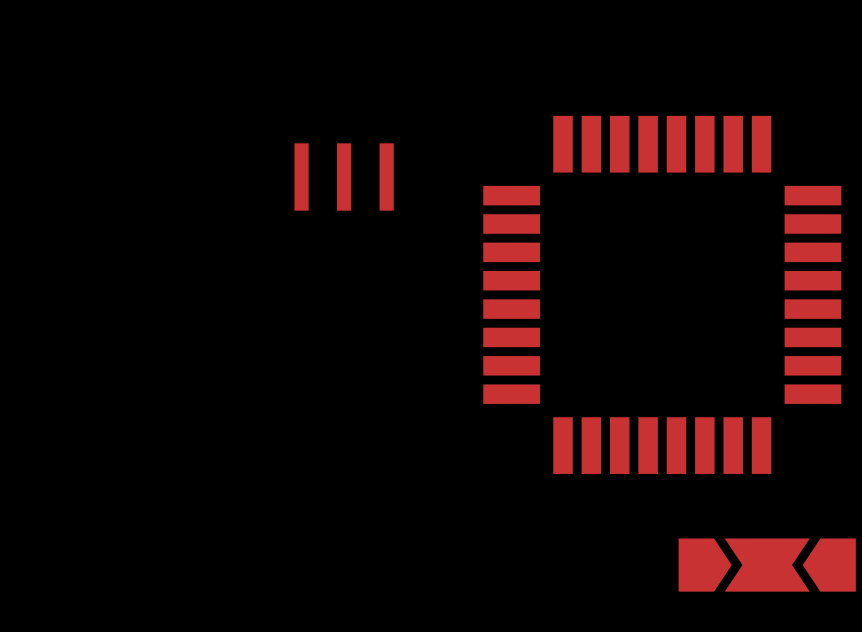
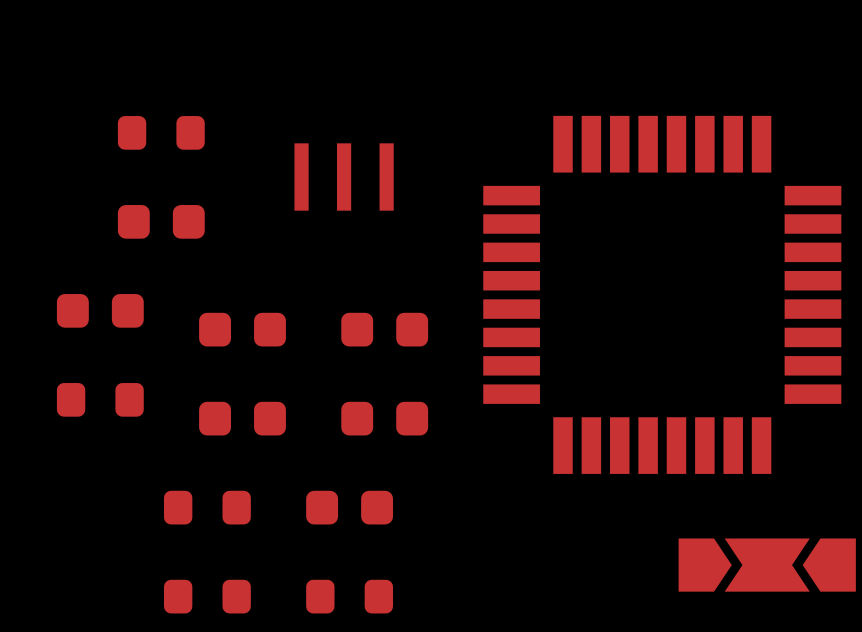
part: none -> (161, 132)
part: none -> (161, 221)
part: none -> (100, 310)
part: none -> (242, 329)
part: none -> (384, 329)
part: none -> (100, 399)
part: none -> (242, 418)
part: none -> (384, 418)
part: none -> (207, 507)
part: none -> (349, 507)
part: none -> (207, 596)
part: none -> (349, 596)

